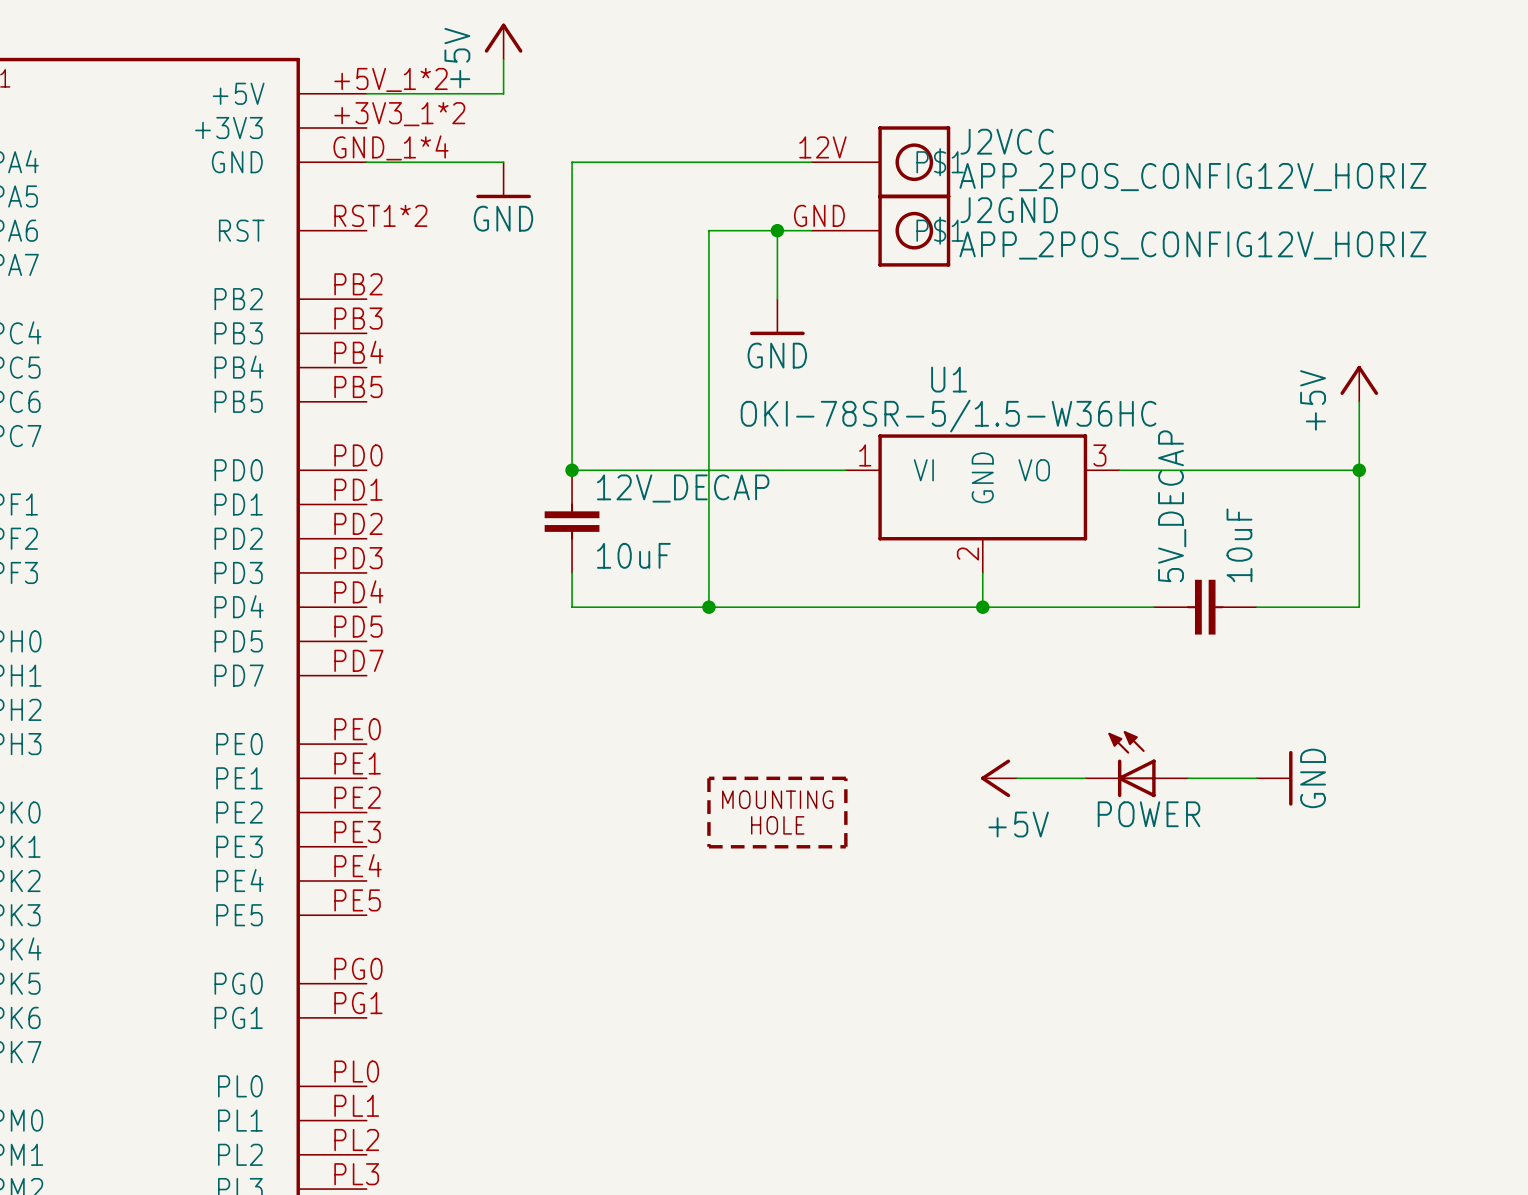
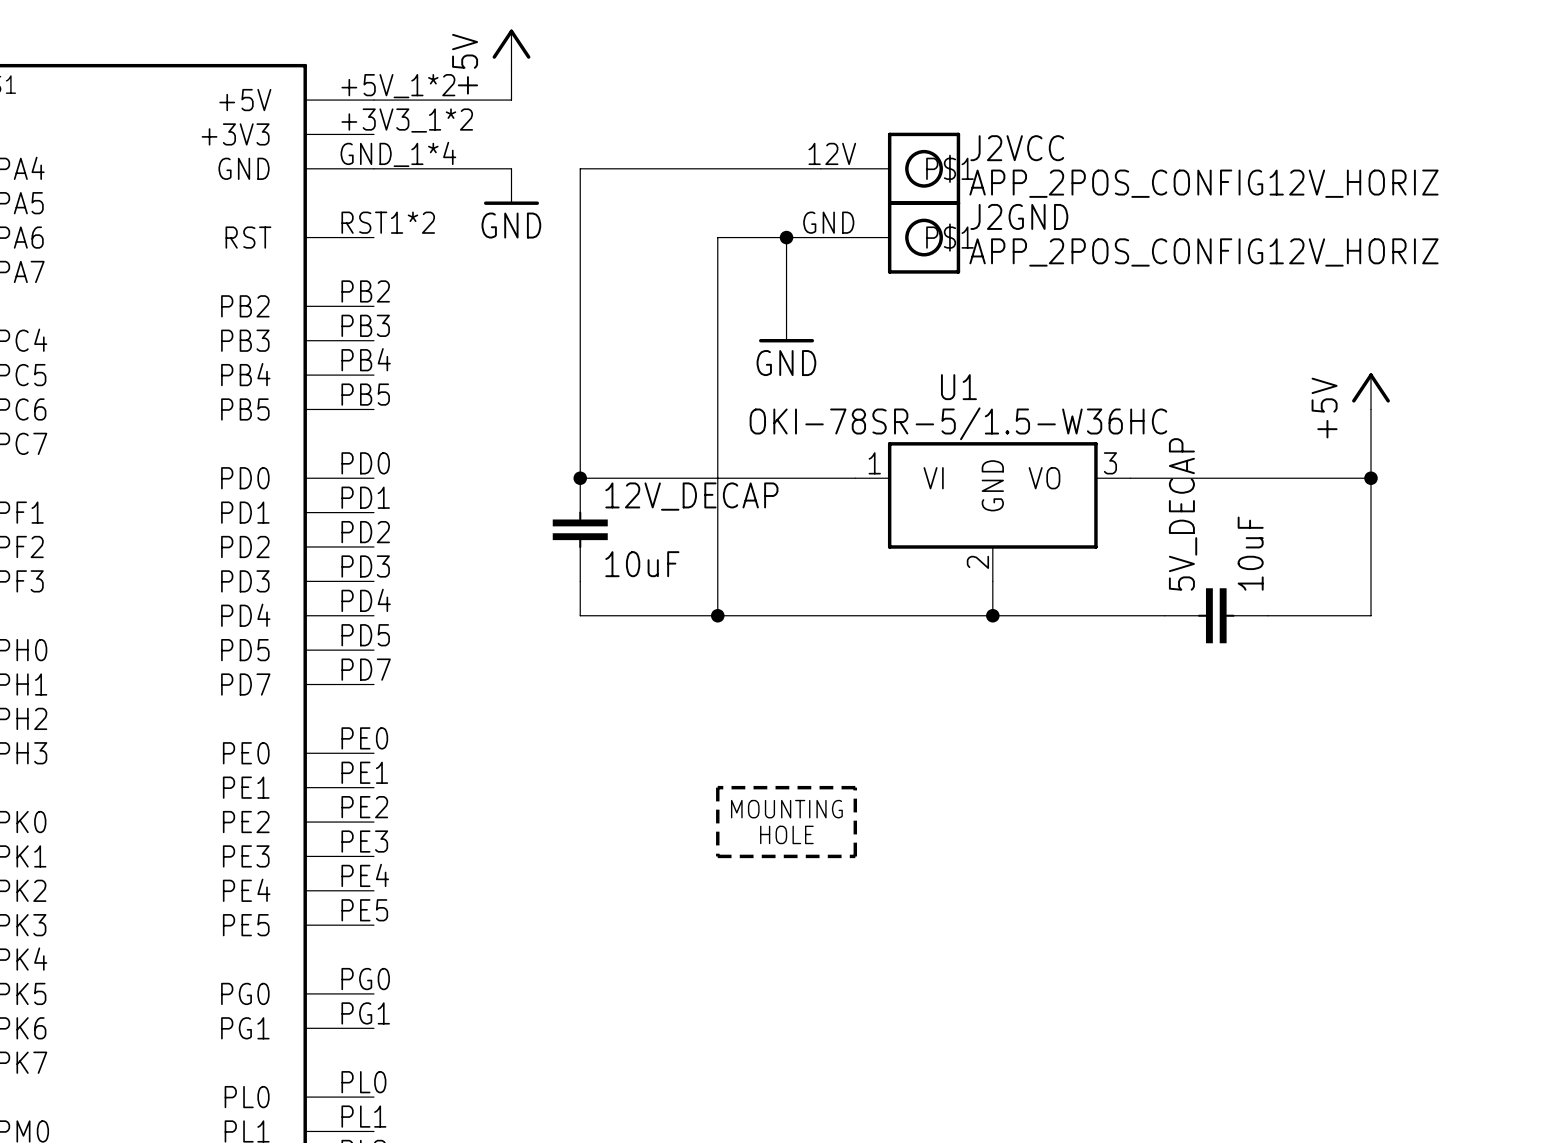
POWER: (1136, 764) -> none
power symbol: +5V (999, 778) -> none
wire: (1016, 778) (1085, 778) -> none
wire: (1188, 778) (1256, 778) -> none
power symbol: GND (1274, 778) -> none

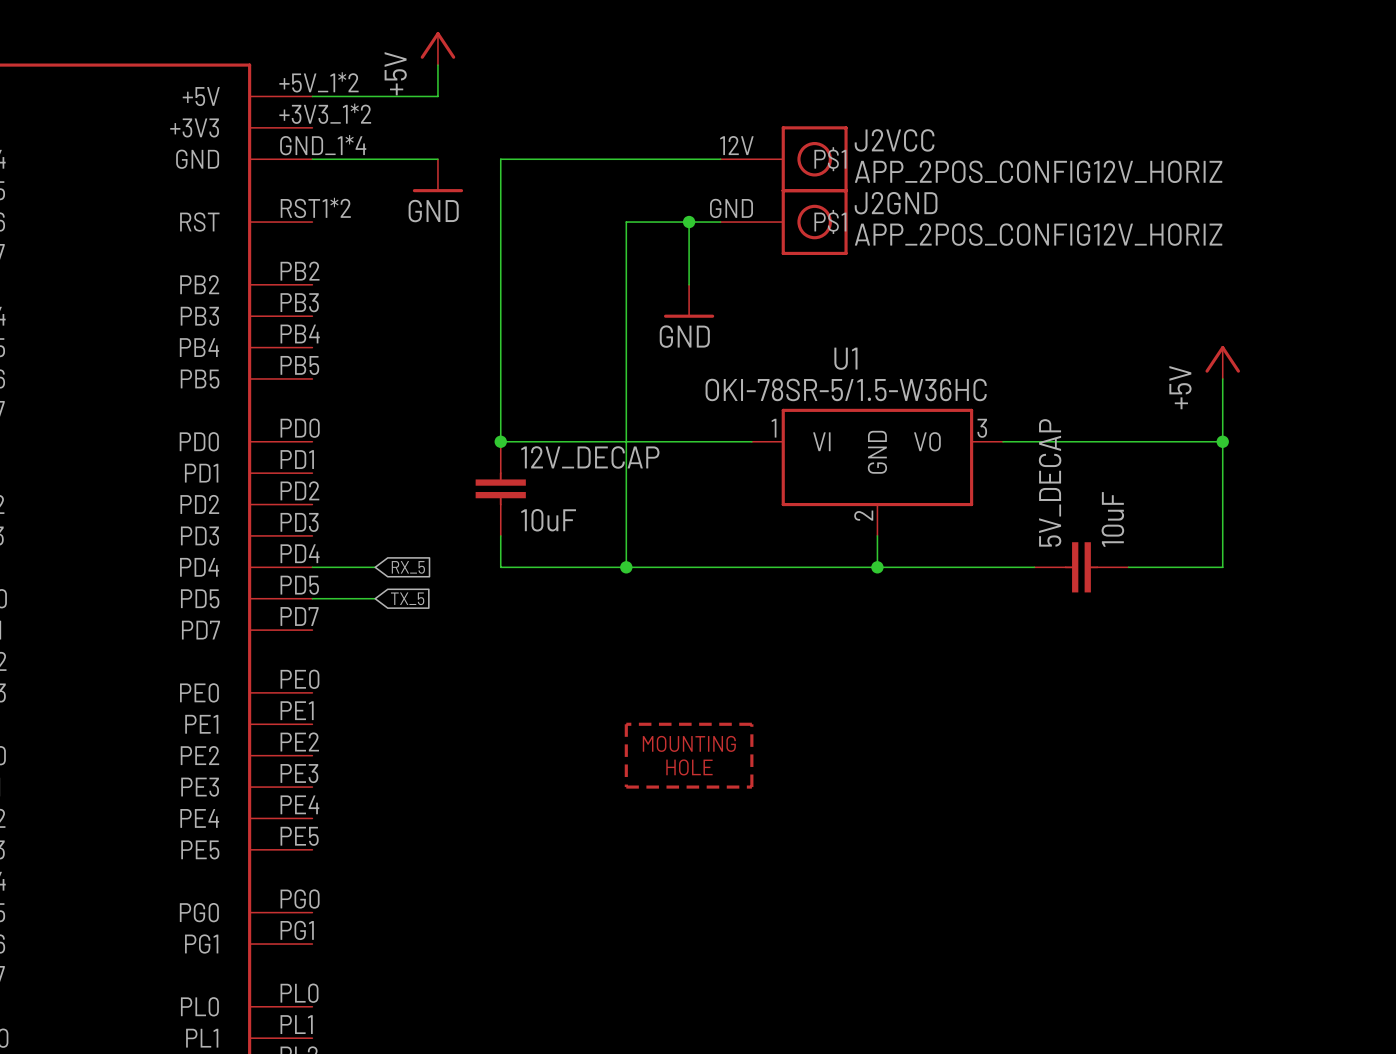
wire: none -> (312, 567) (375, 567)
global label: none -> RX_5 (408, 567)
wire: none -> (312, 598) (375, 598)
global label: none -> TX_5 (407, 598)

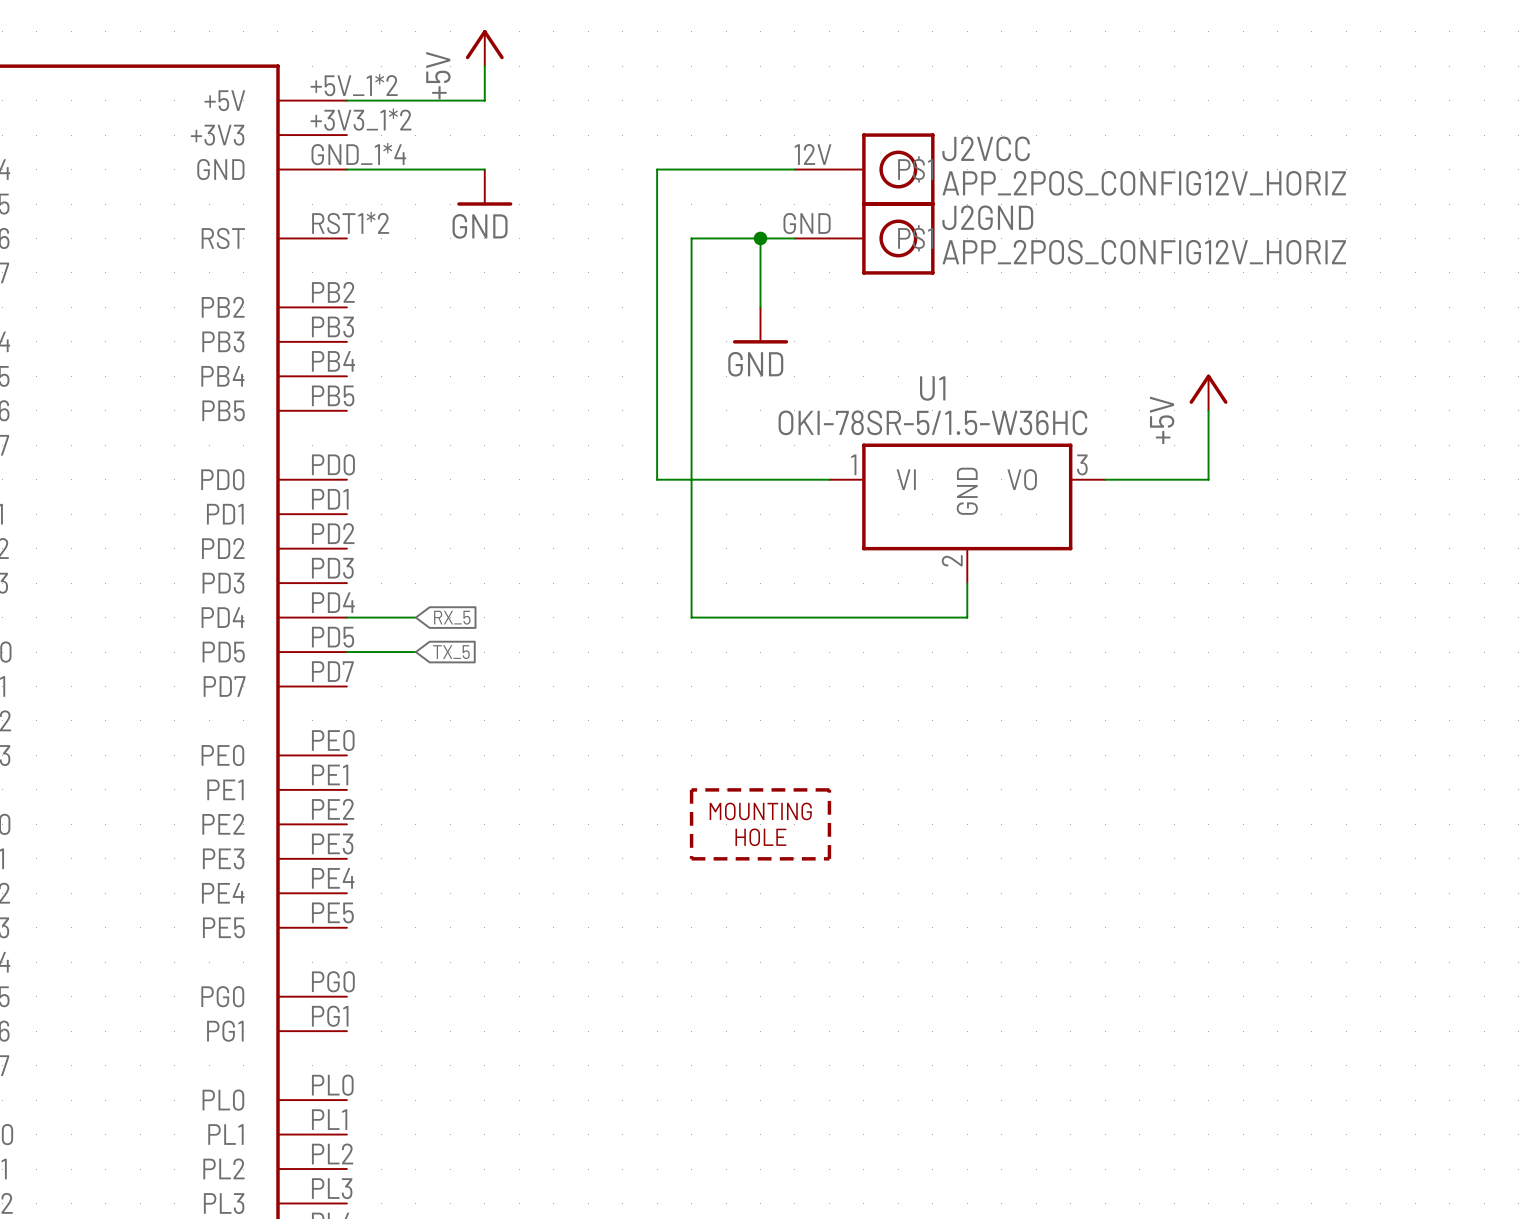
wire: (594, 159) (500, 159) (500, 441) (594, 441) -> (657, 169) (657, 479)
power symbol position: +5V (1222, 362) -> +5V (1208, 392)
wire: (1222, 378) (1222, 567) (1128, 567) -> none
junction: (500, 441) -> none
wire: (1097, 441) (1222, 441) -> (1208, 479) (1208, 410)
junction: (1222, 441) -> none
12V_DECAP: 10uF (500, 488) -> none
wire: (500, 535) (500, 567) (626, 567) -> none
junction: (626, 567) -> none
wire: (877, 567) (1034, 567) -> none
junction: (877, 567) -> none
5V_DECAP: 10uF (1081, 567) -> none

